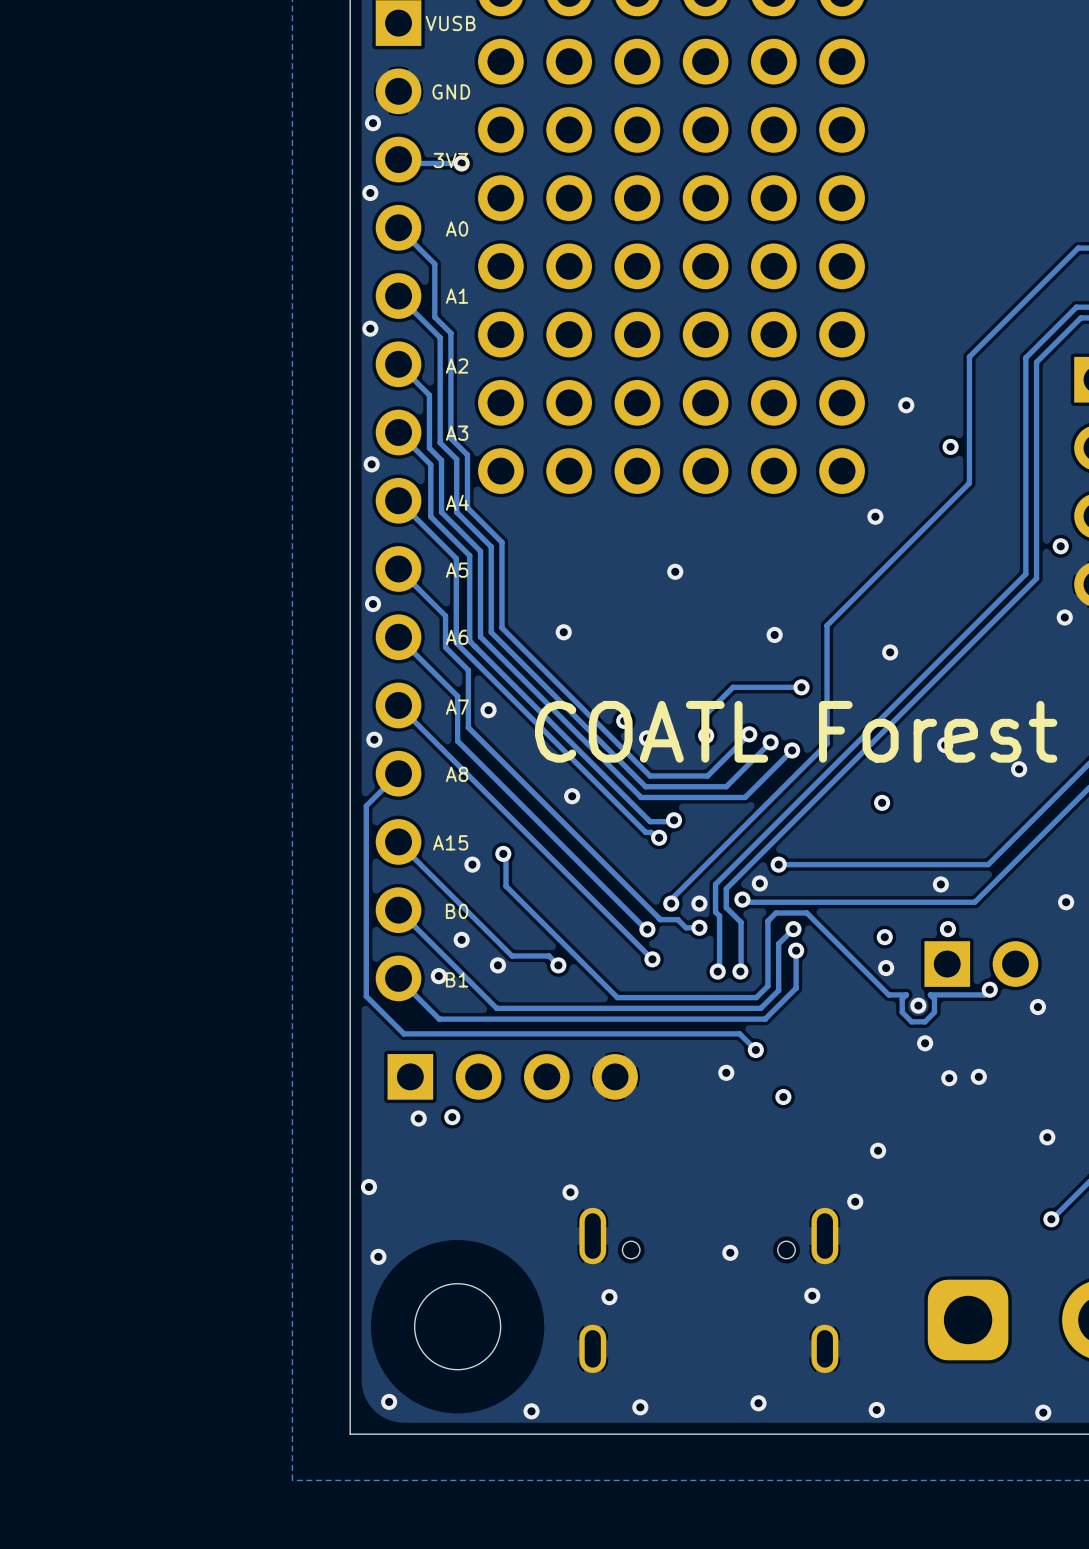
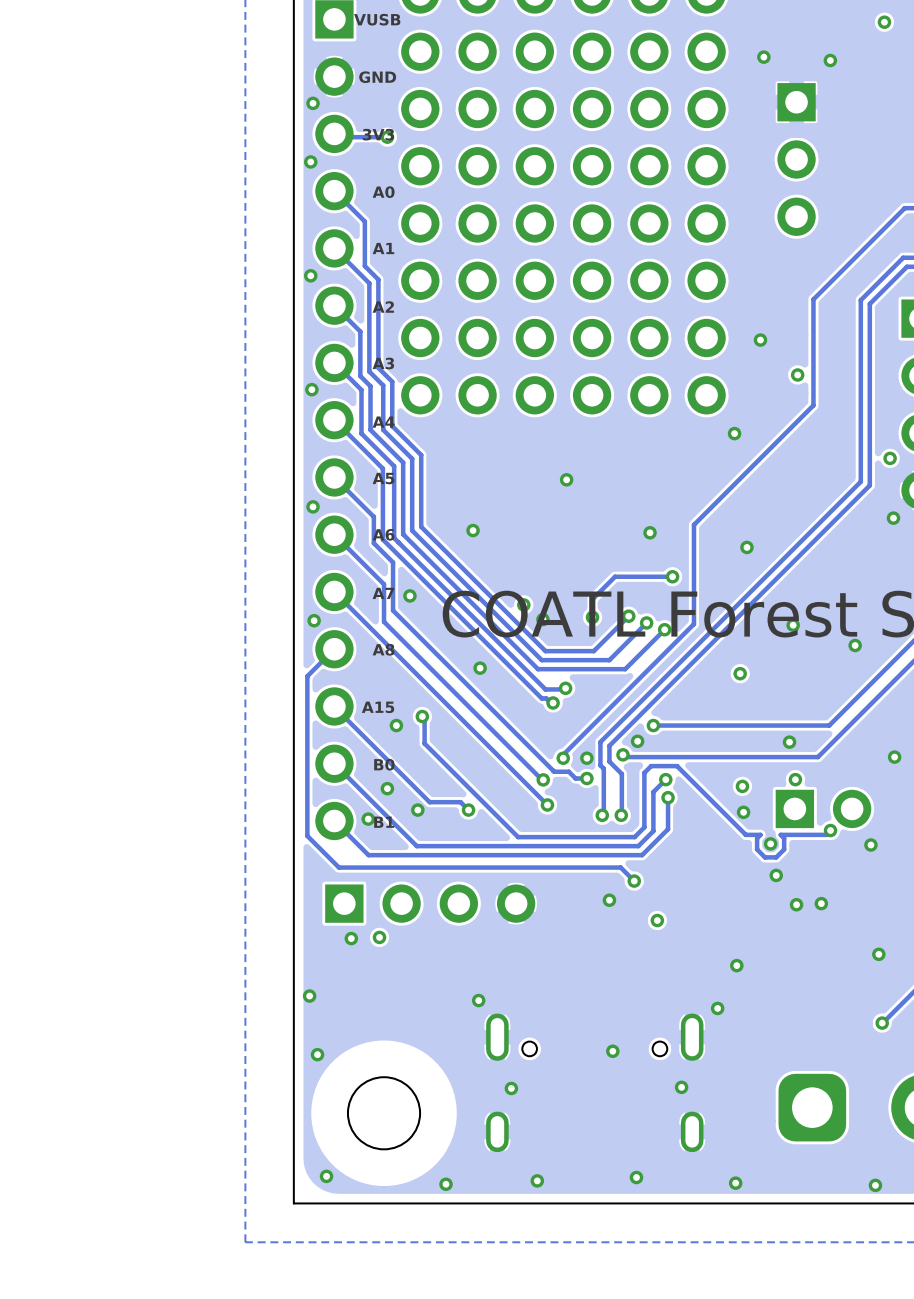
via: none -> (884, 22)
via: none -> (763, 57)
via: none -> (830, 60)
part: none -> (796, 159)

